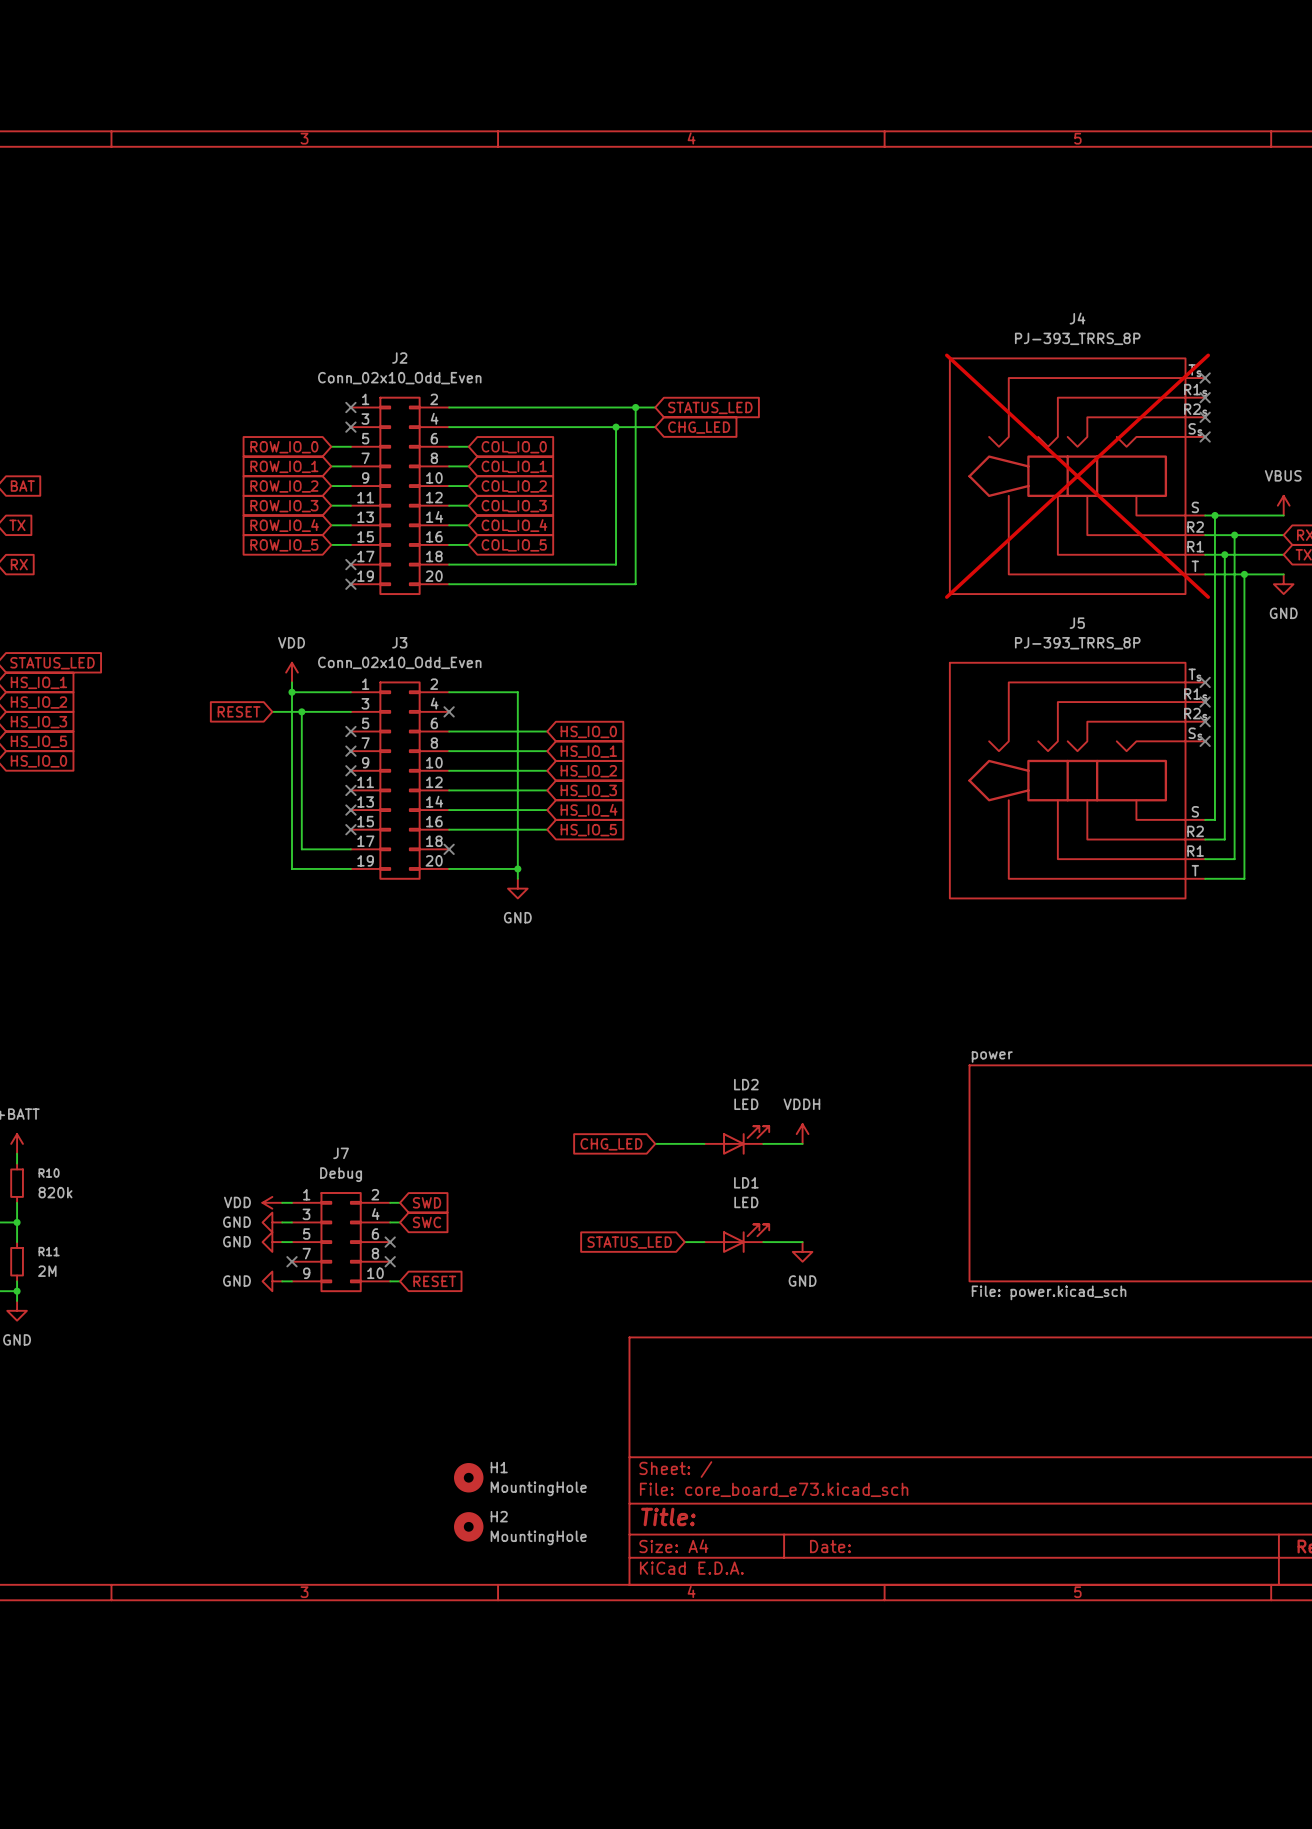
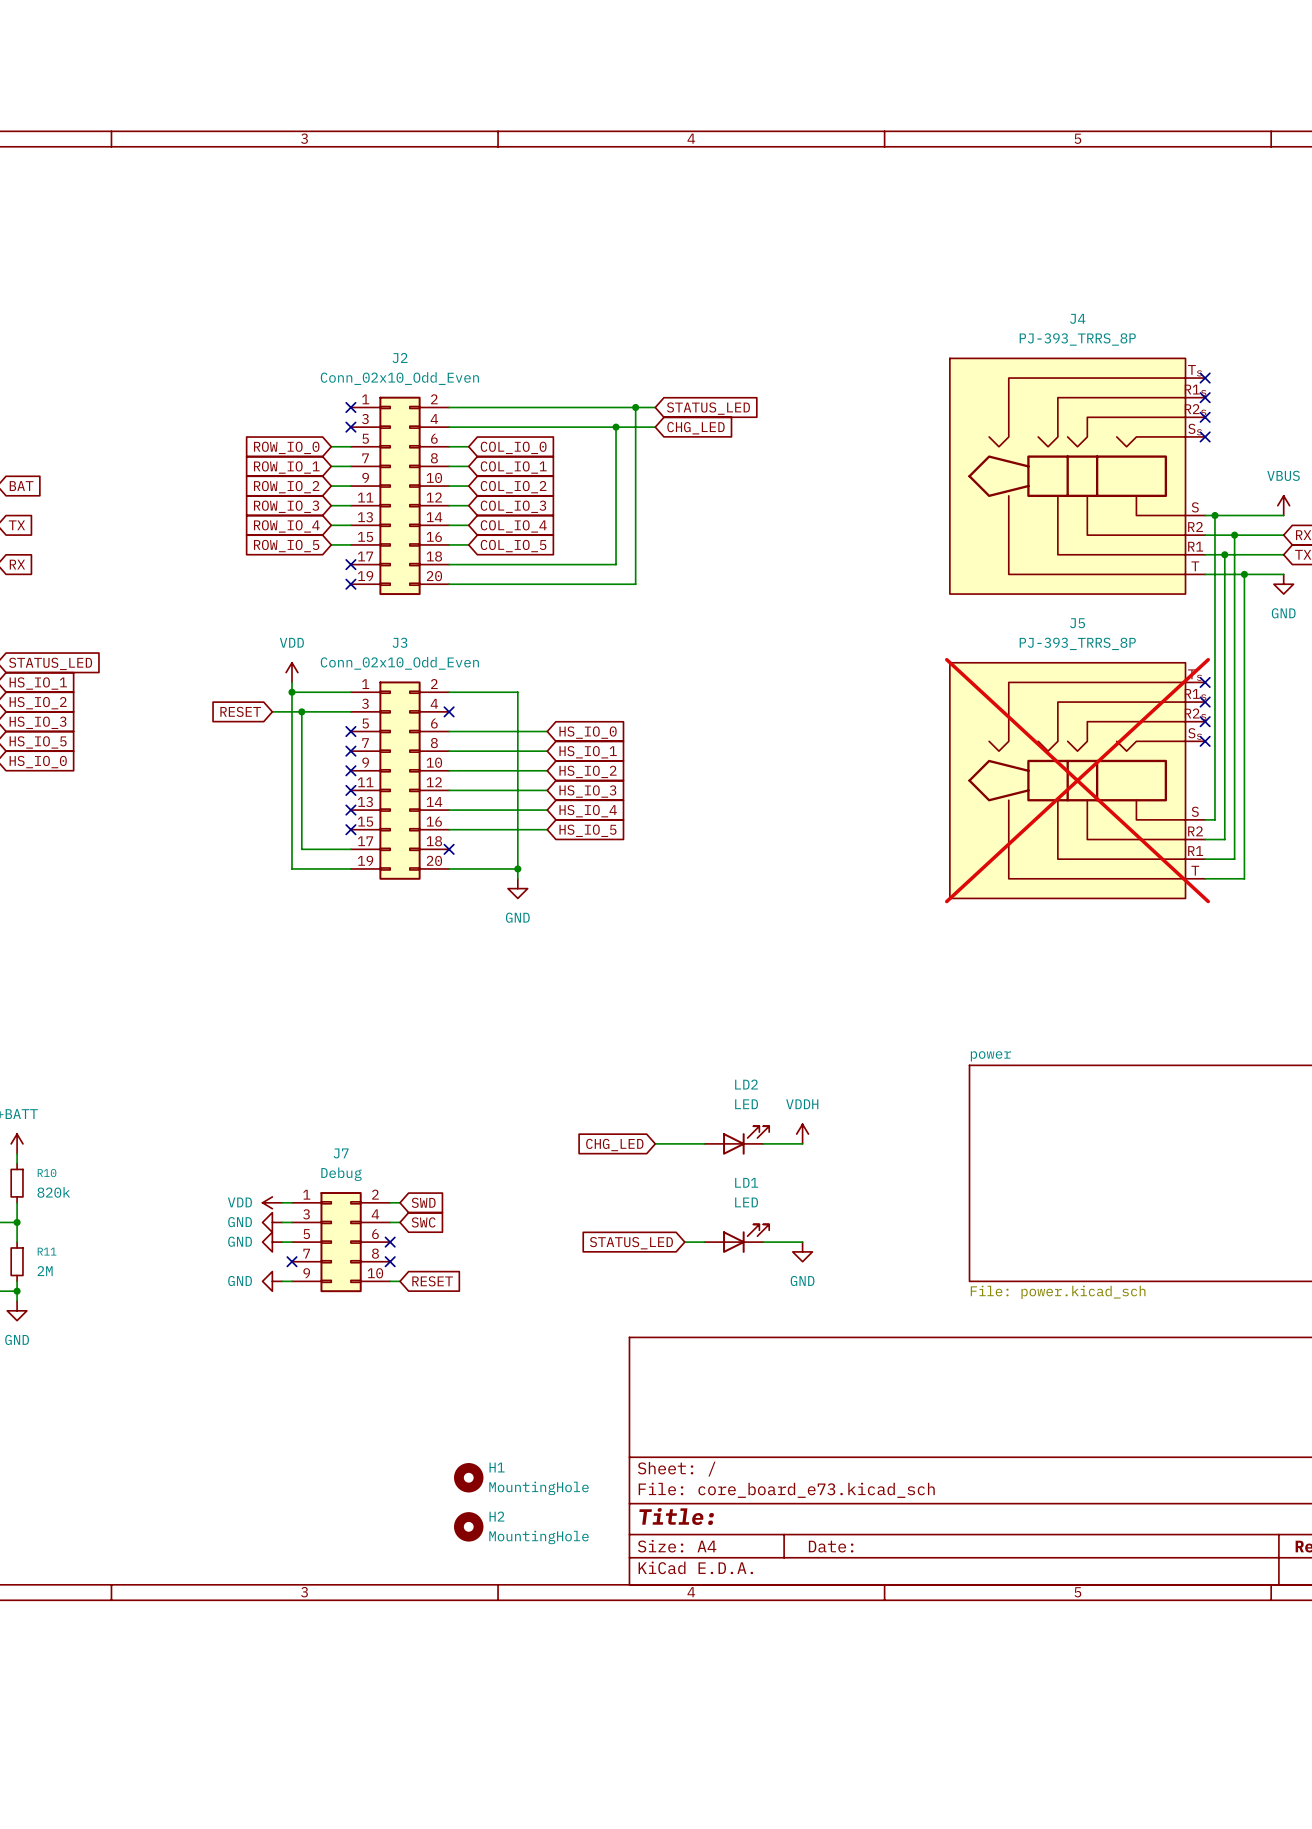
J4 do-not-place cross: (1077, 476) -> none
J5 do-not-place cross: none -> (1077, 780)

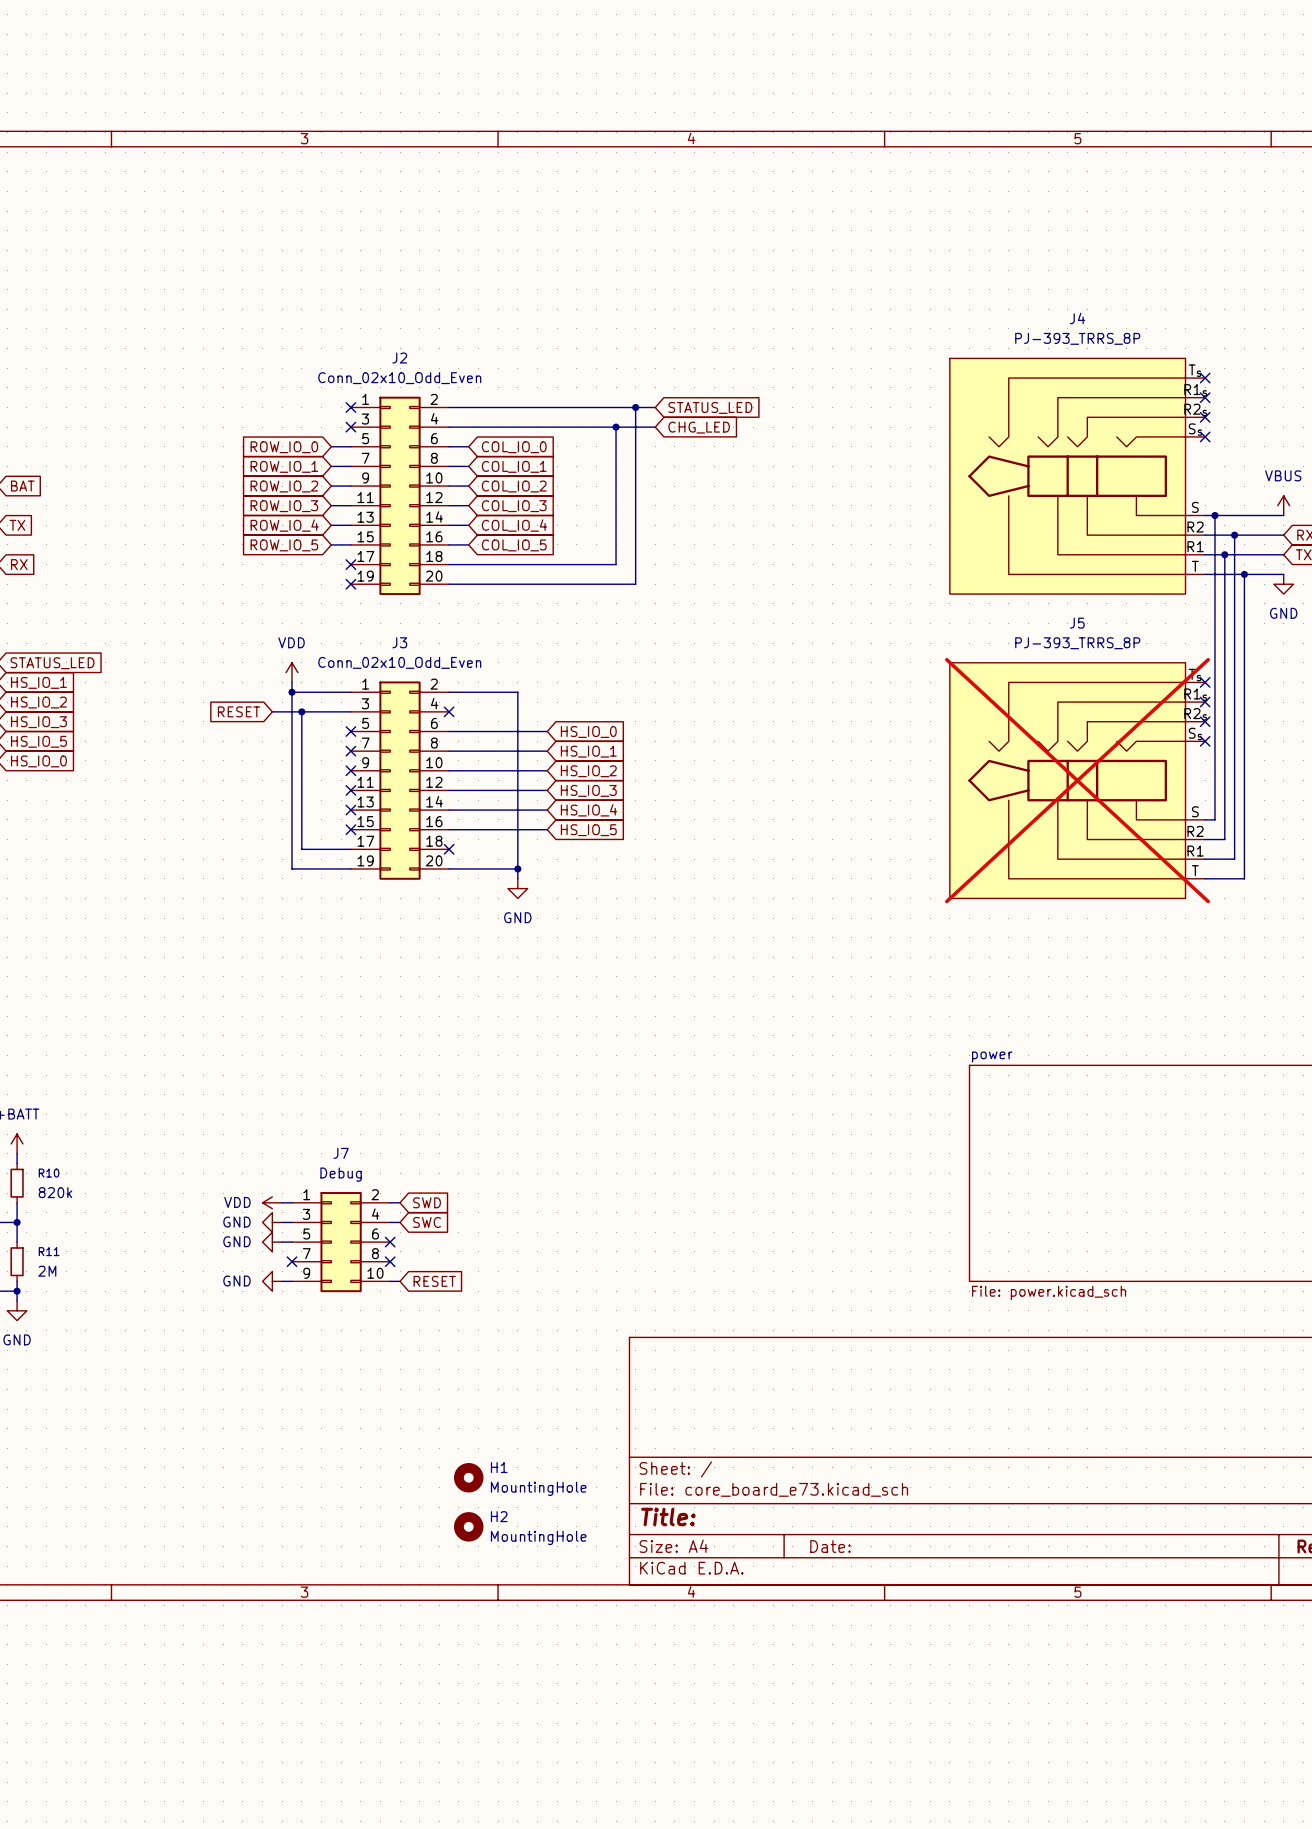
power symbol: VDDH (802, 1134) -> none
LD2: LED (736, 1140) -> none
wire: (655, 1143) (704, 1143) -> none
wire: (763, 1143) (802, 1143) -> none
global label: CHG_LED (614, 1145) -> none
LD1: LED (736, 1238) -> none
wire: (684, 1242) (704, 1242) -> none
wire: (763, 1242) (802, 1242) -> none
global label: STATUS_LED (631, 1243) -> none
power symbol: GND (802, 1251) -> none

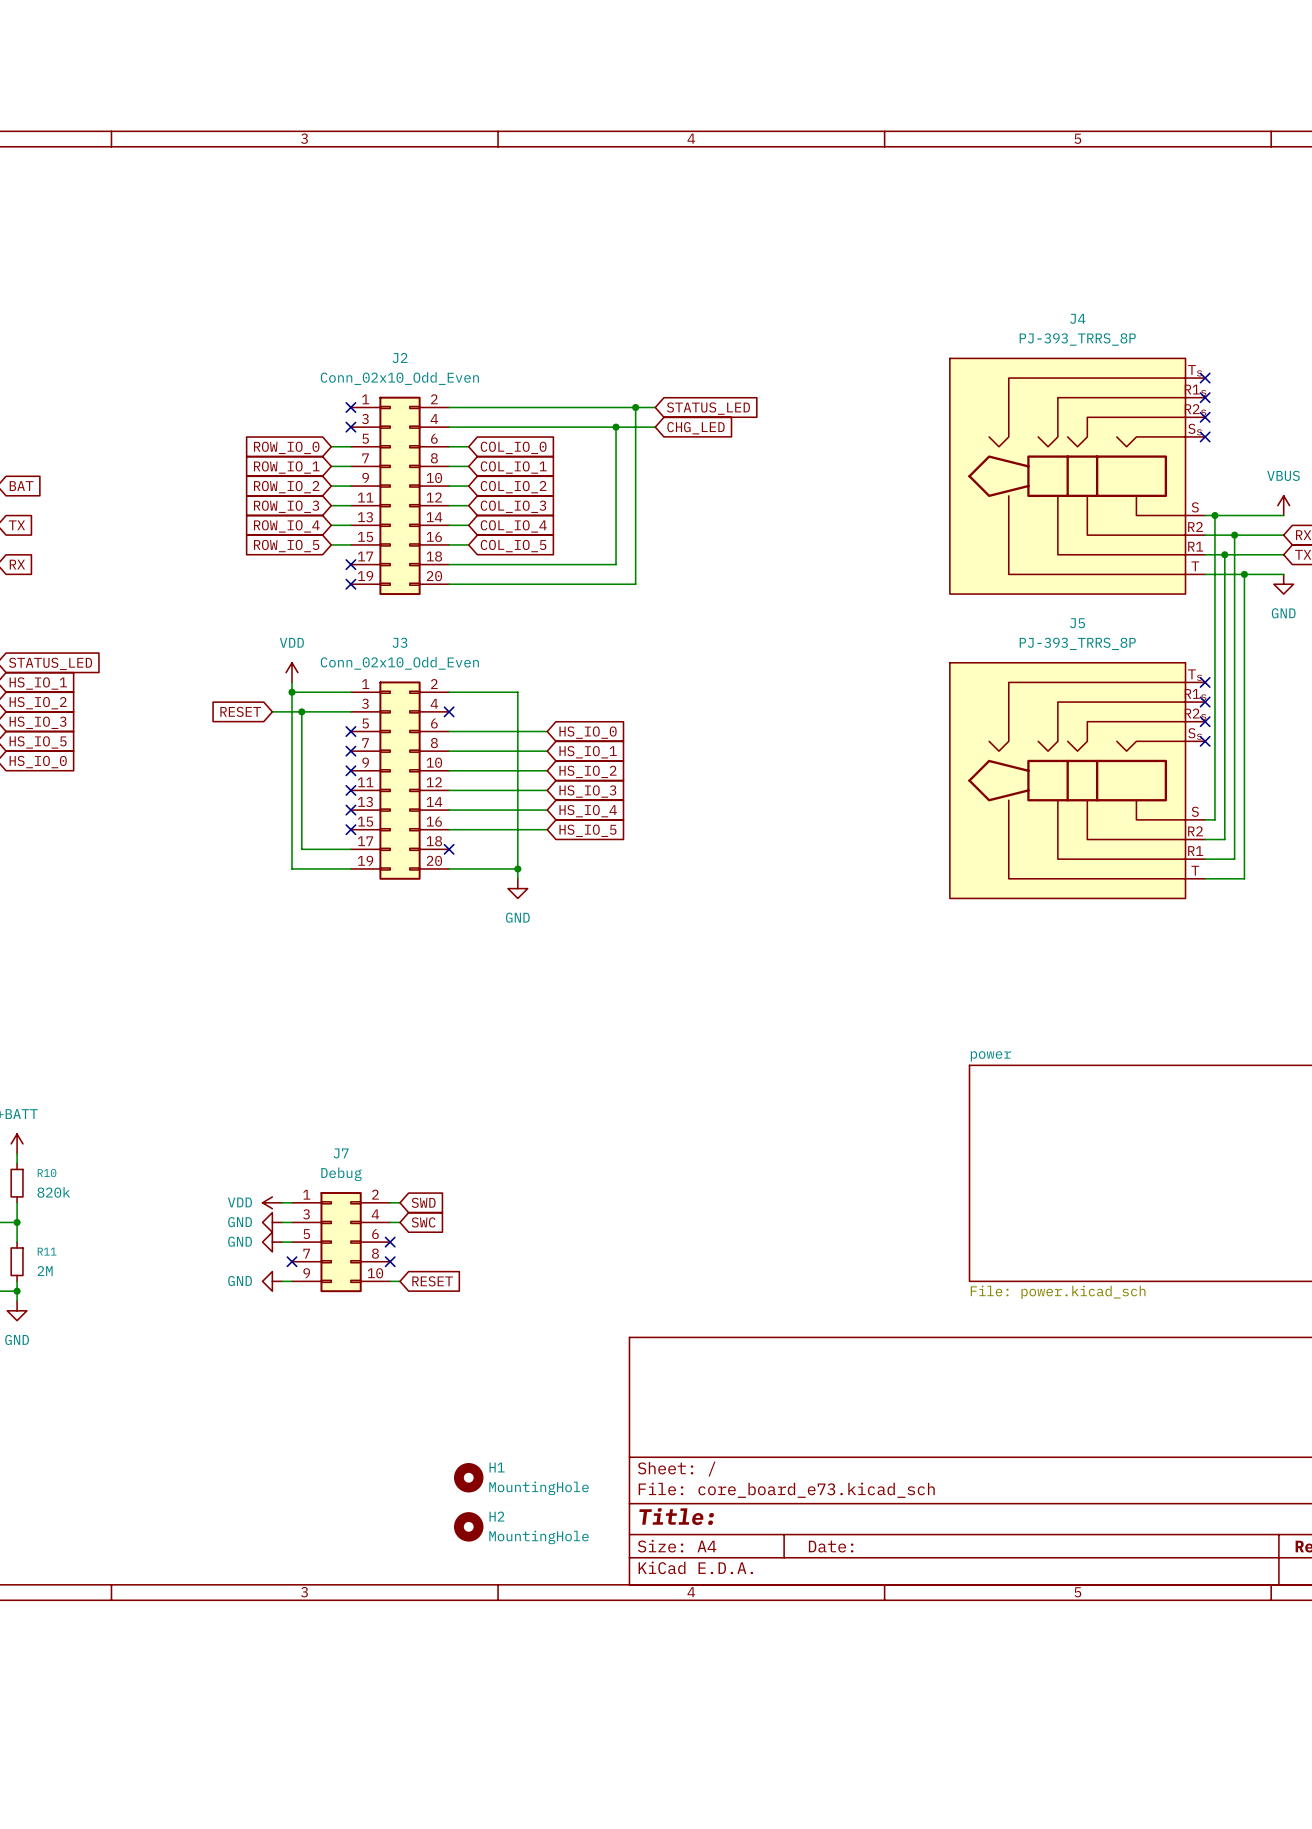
J5 do-not-place cross: (1077, 780) -> none

